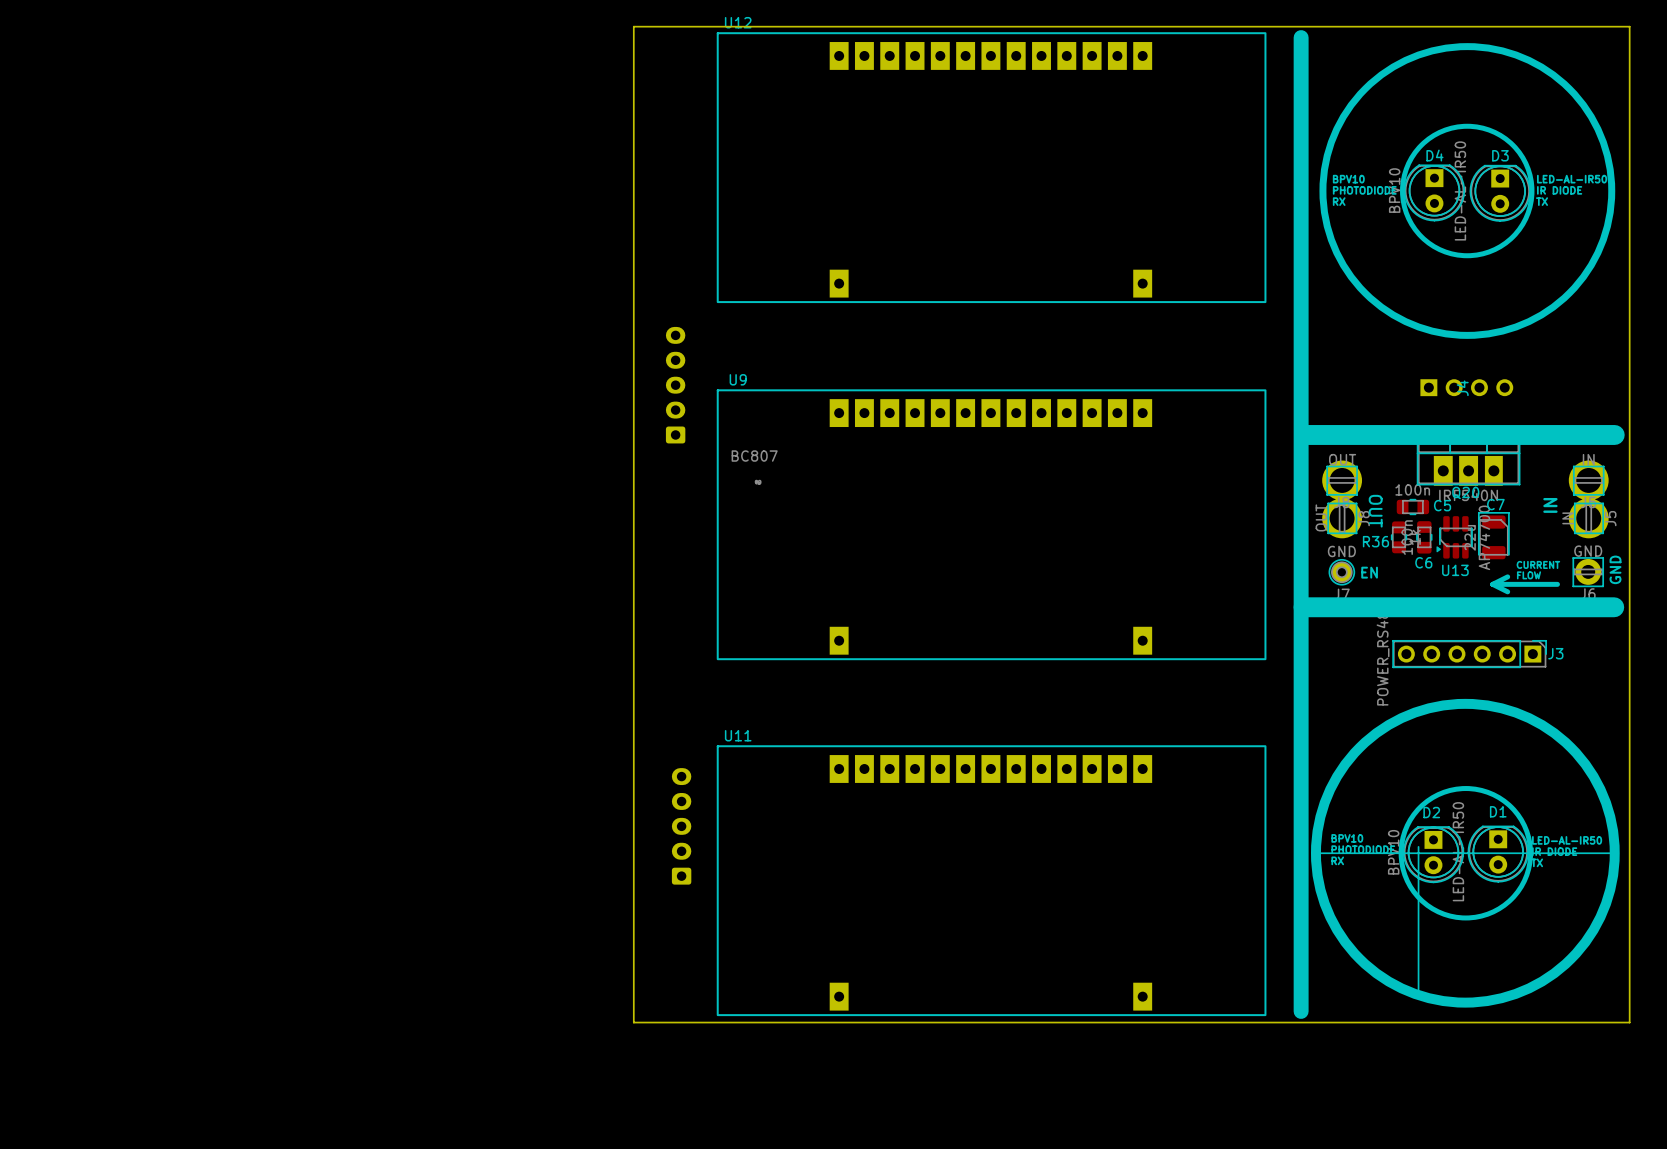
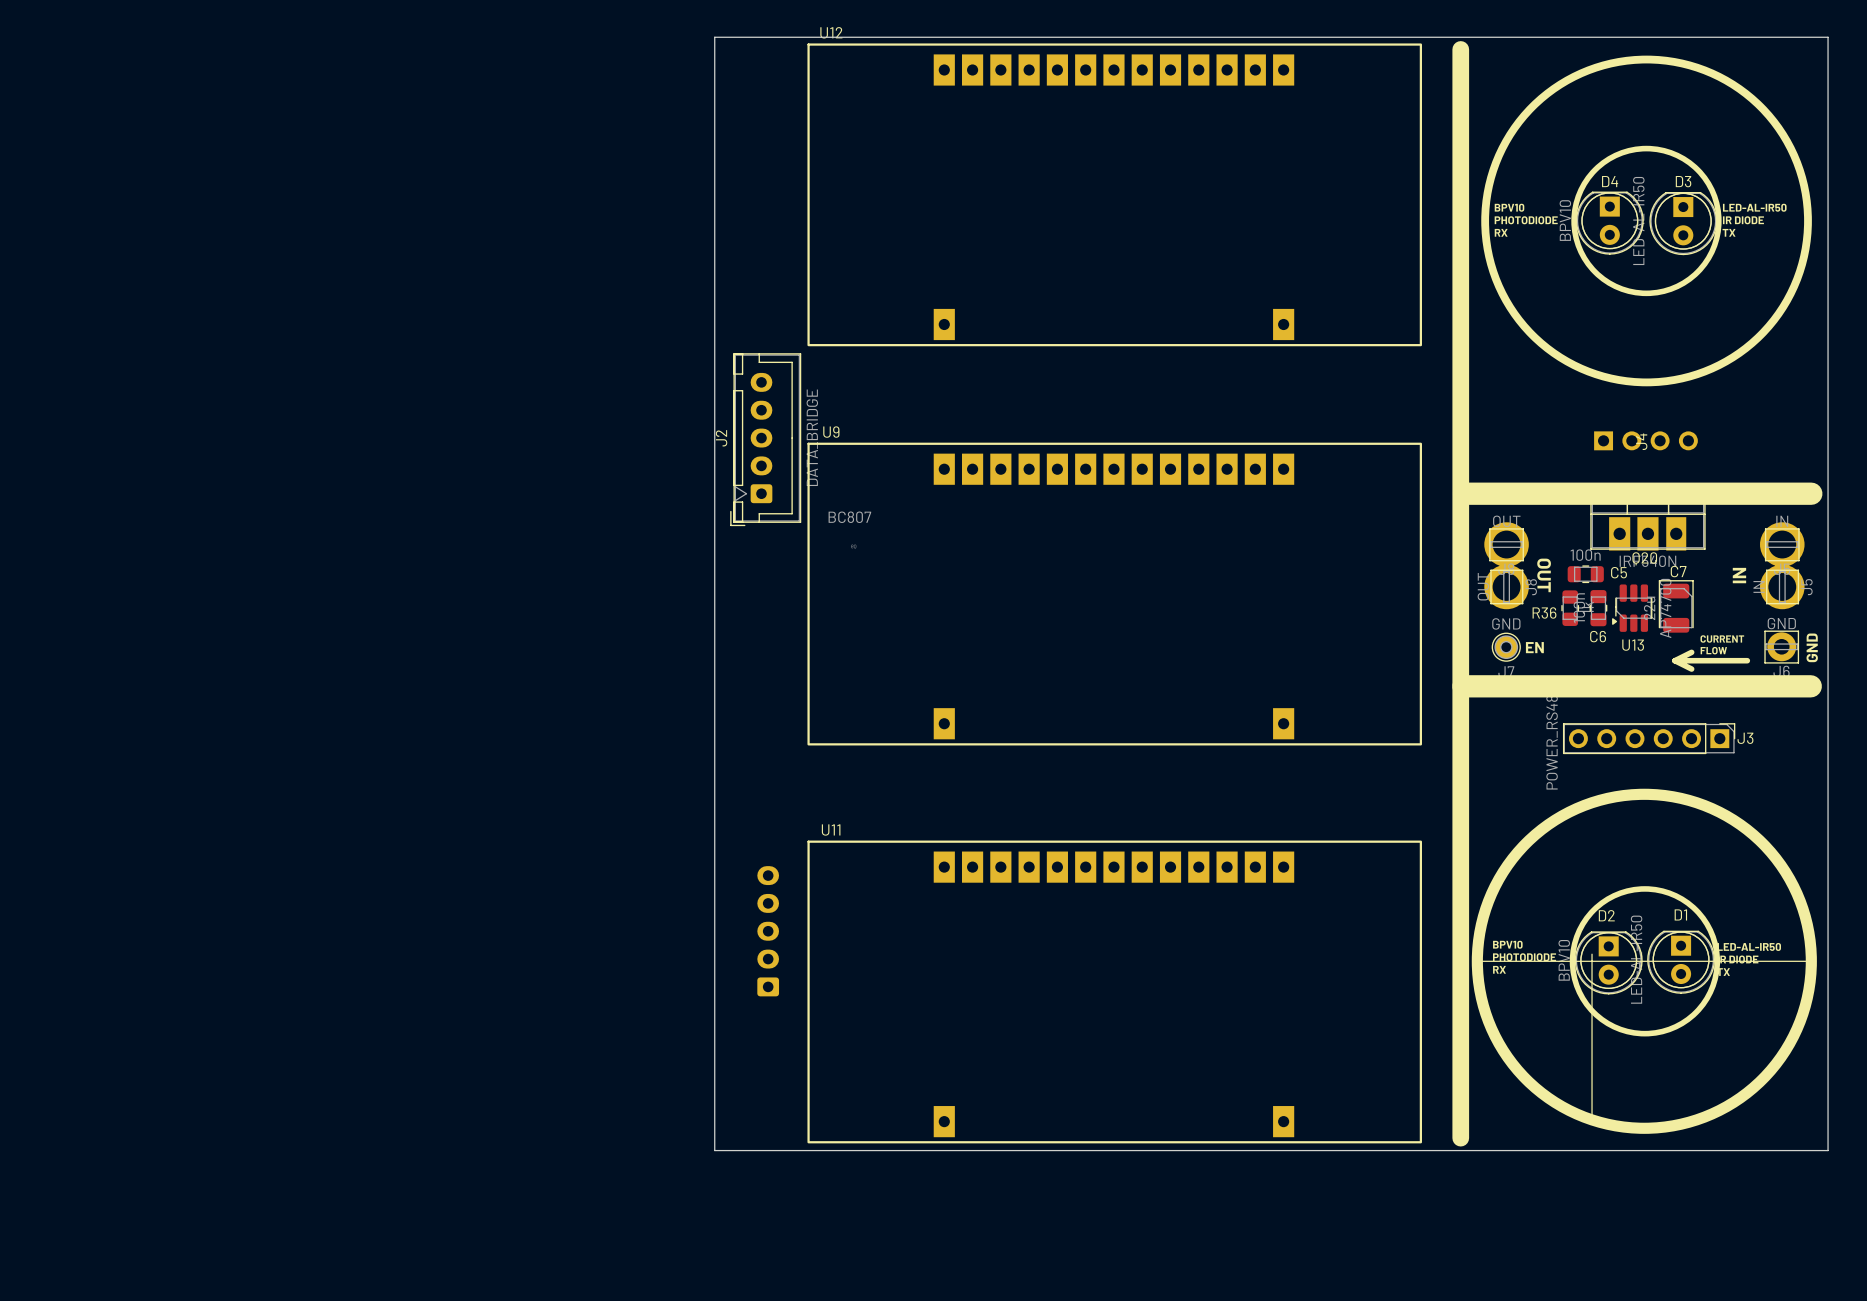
J2 side: bottom (675, 385) -> top (765, 439)

